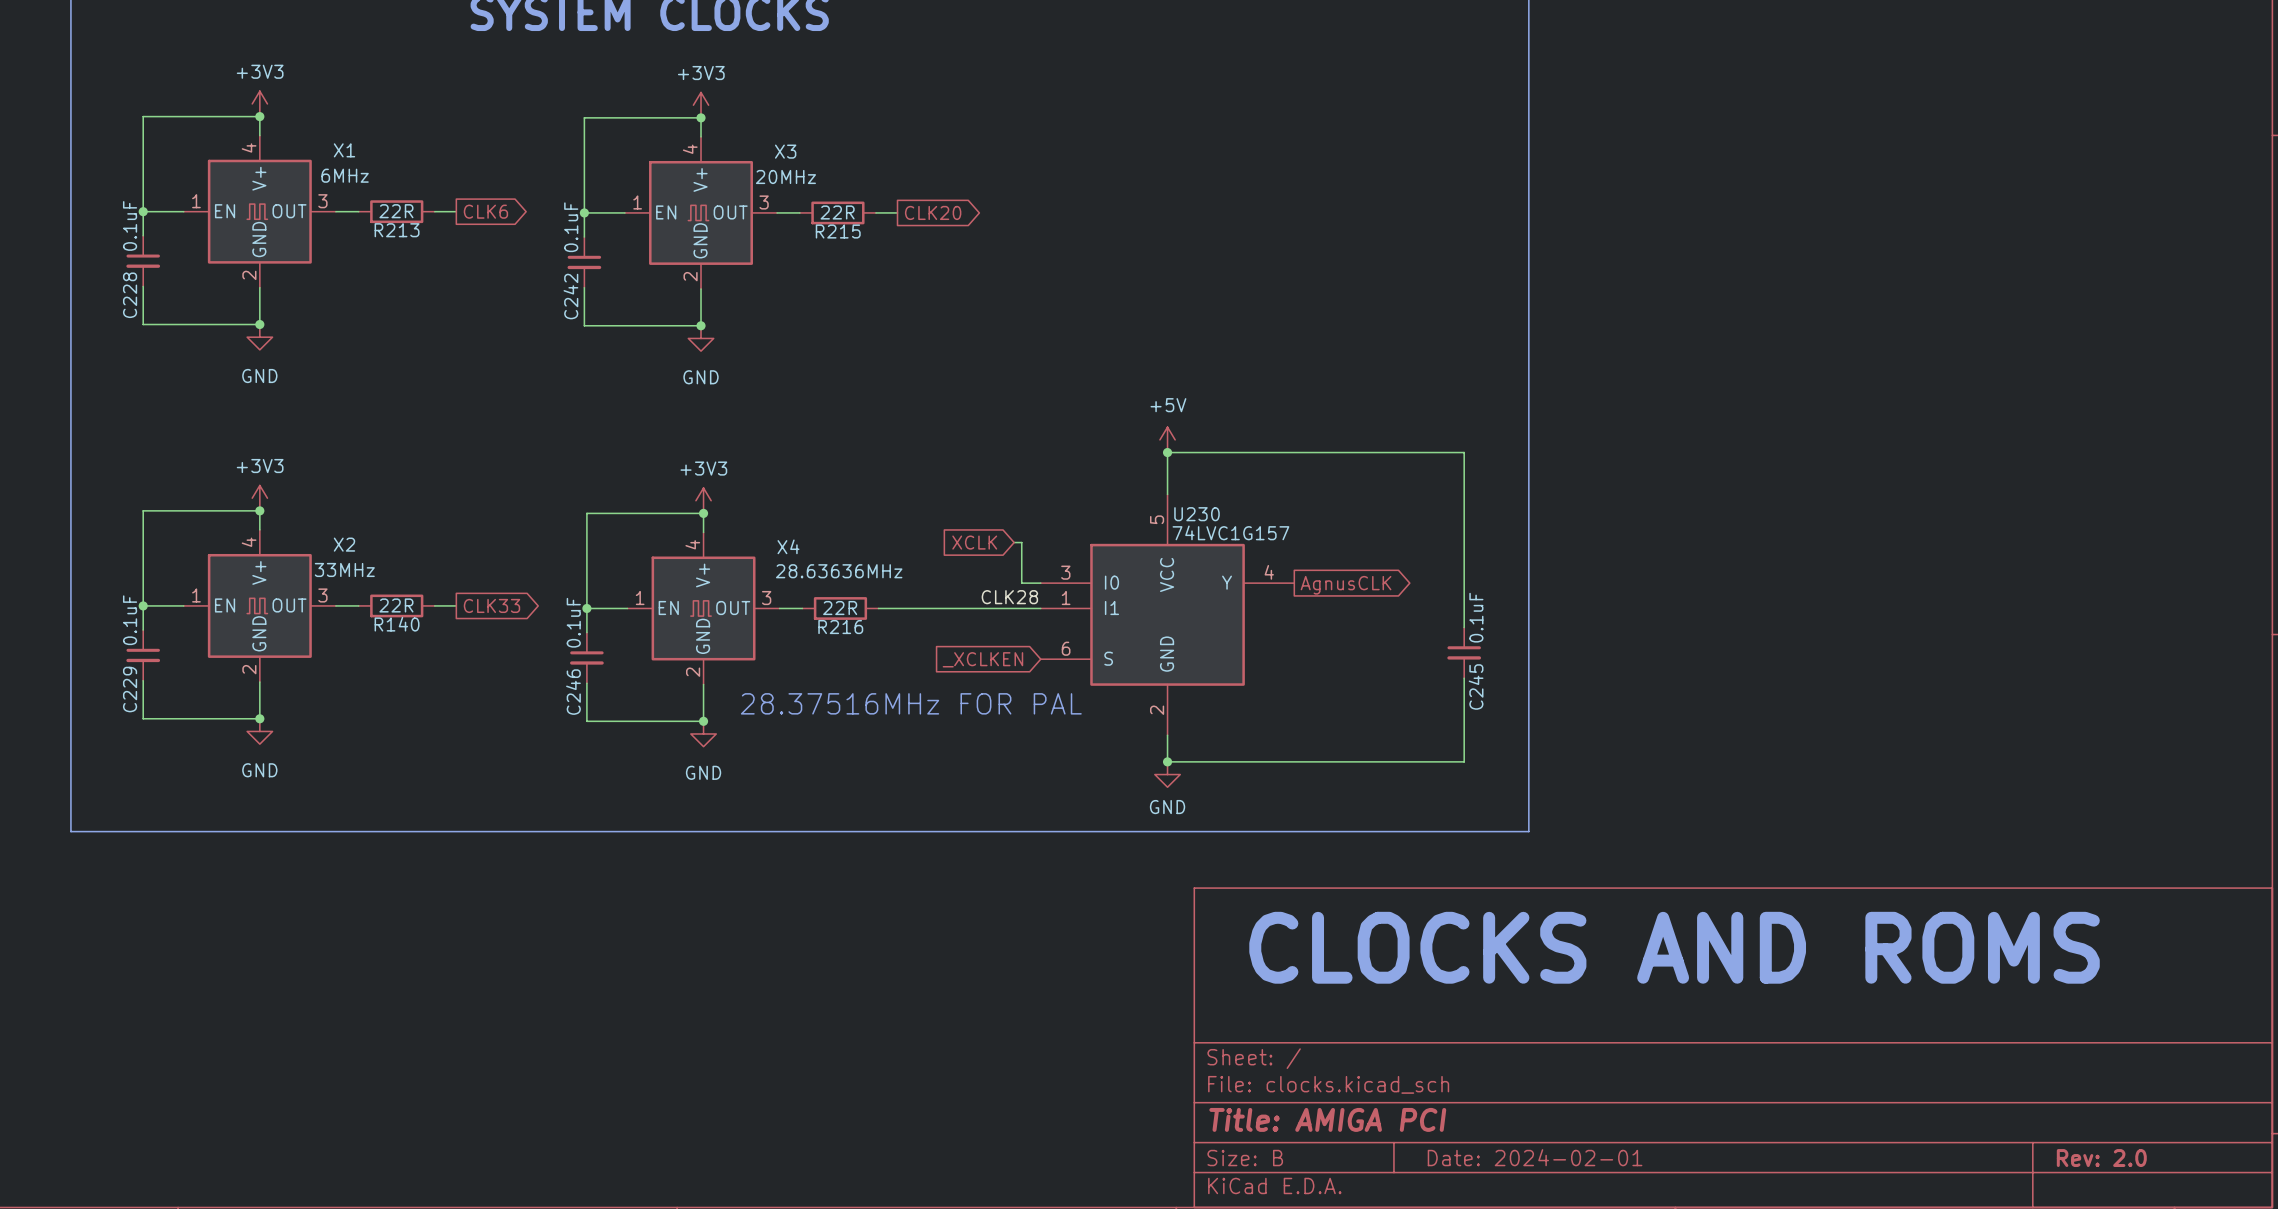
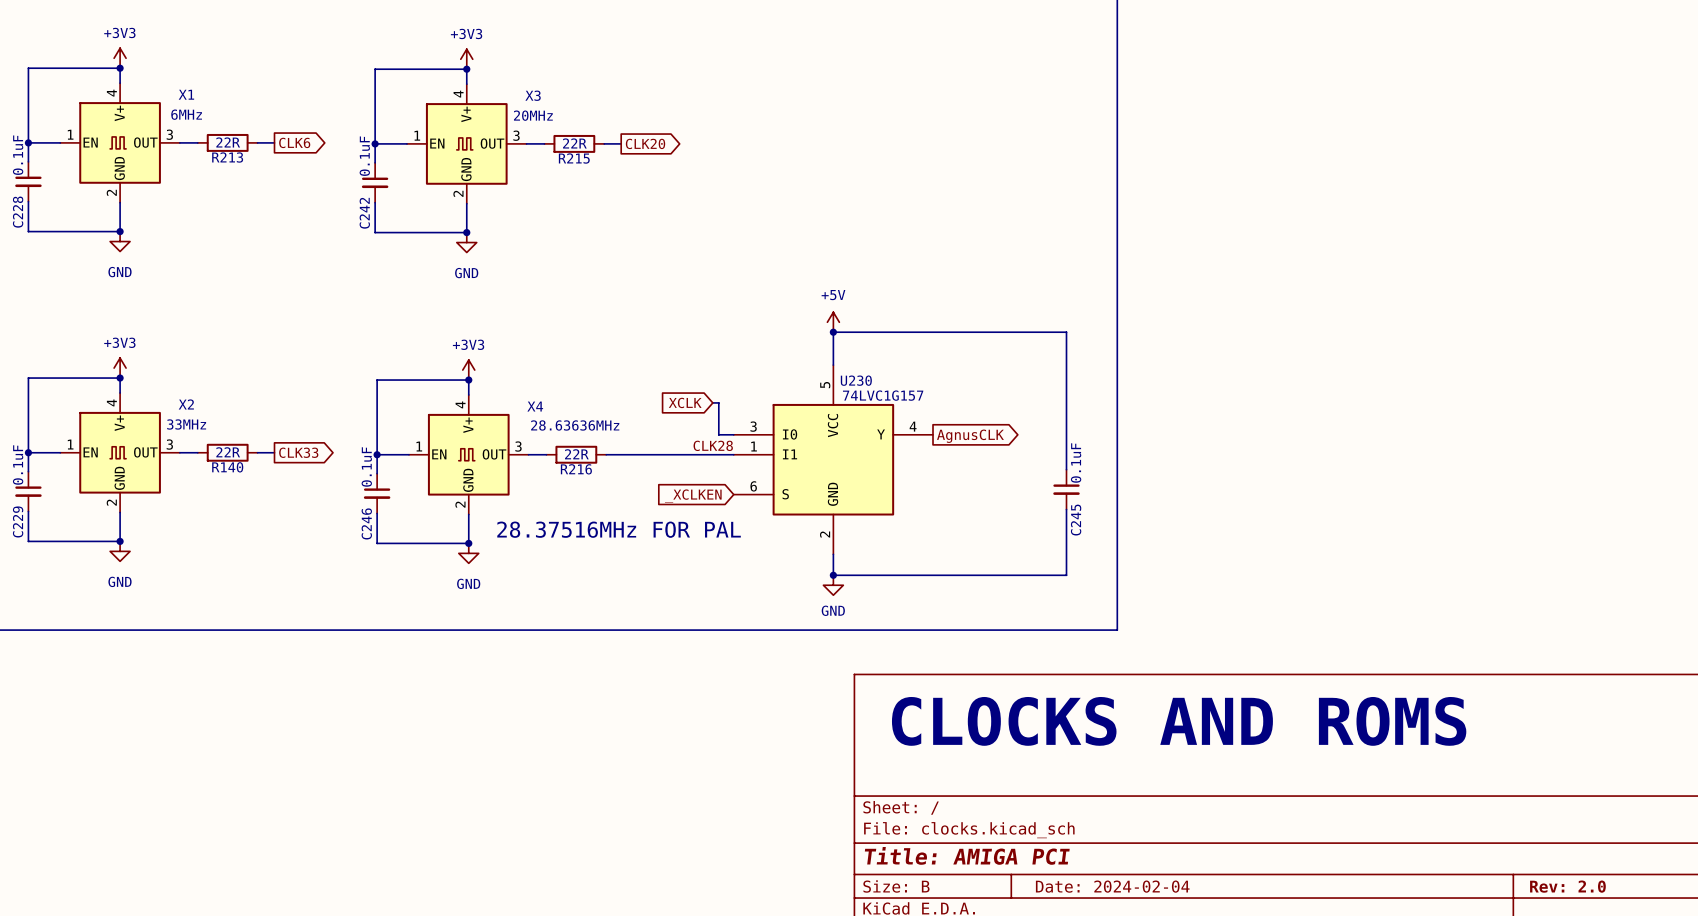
title block: Date: 2024-02-01 (1535, 1157) -> Date: 2024-02-04 (1112, 886)

